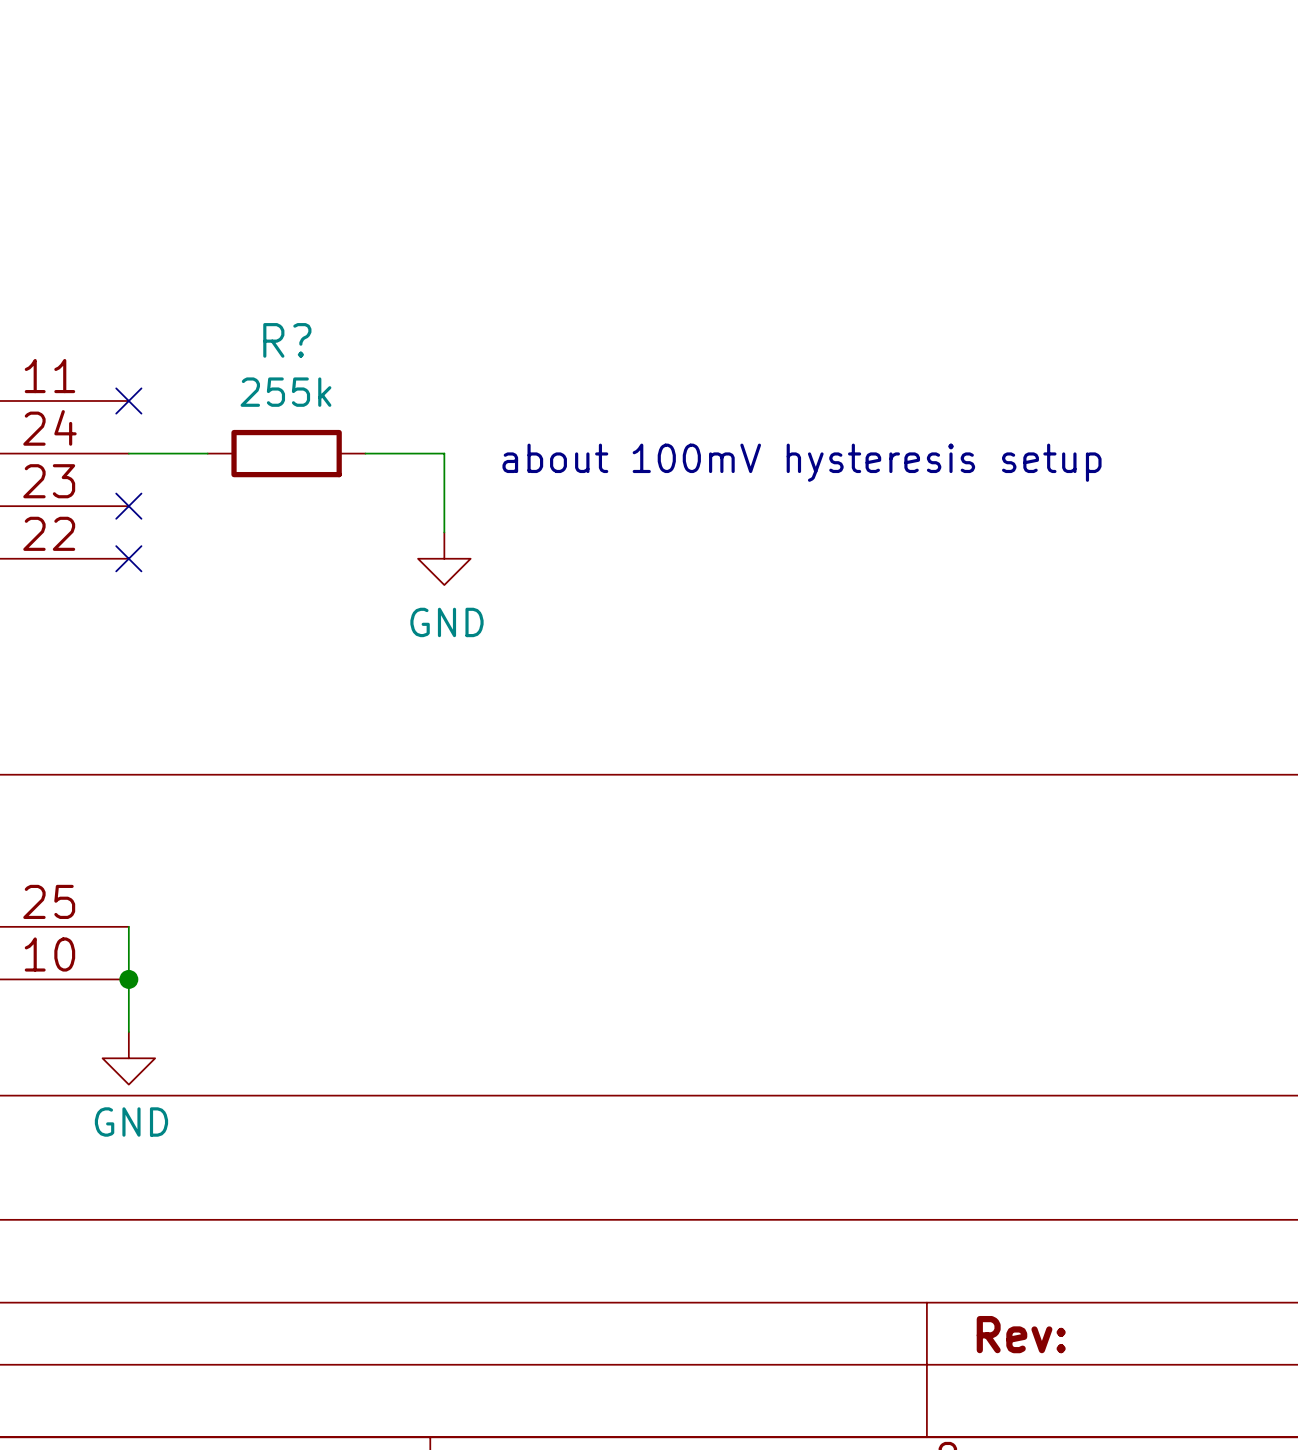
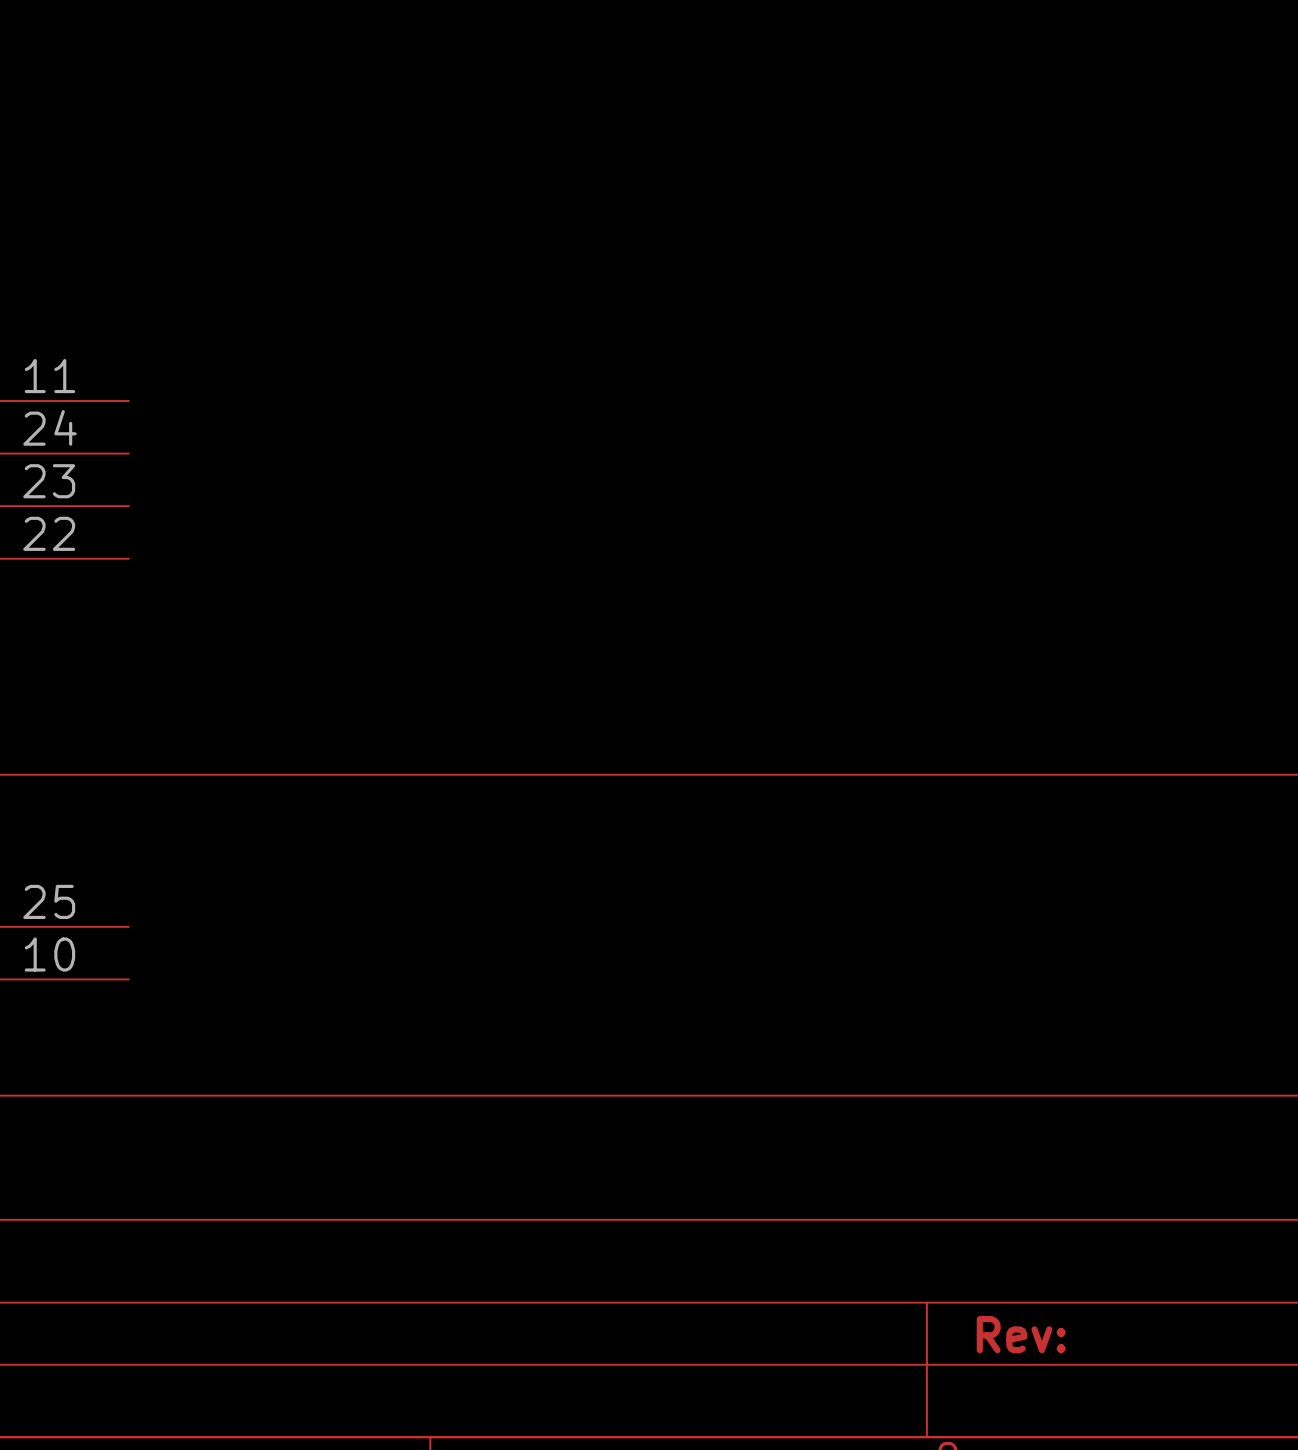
no-connect mark: (128, 400) -> none
wire: (128, 453) (207, 453) -> none
R?: (286, 453) -> none
wire: (365, 453) (444, 453) (444, 532) -> none
text: about 100mV hysteresis setup (802, 462) -> none
no-connect mark: (128, 506) -> none
no-connect mark: (128, 558) -> none
power symbol: GND (444, 558) -> none
wire: (128, 926) (128, 1032) -> none
junction: (128, 979) -> none
power symbol: GND (128, 1058) -> none

